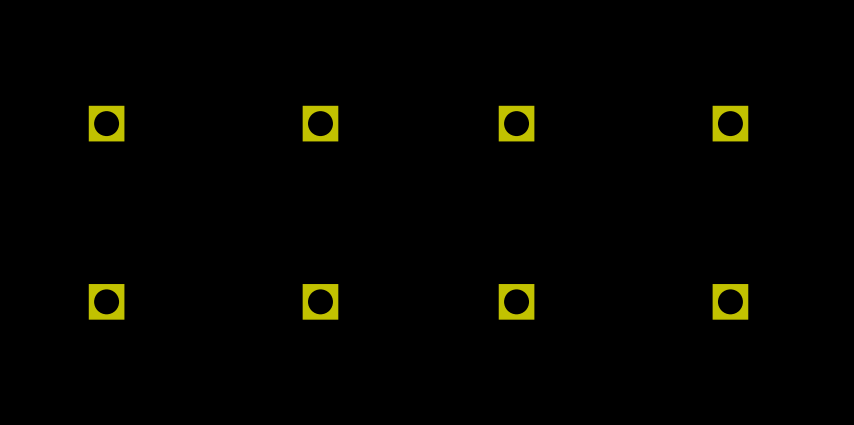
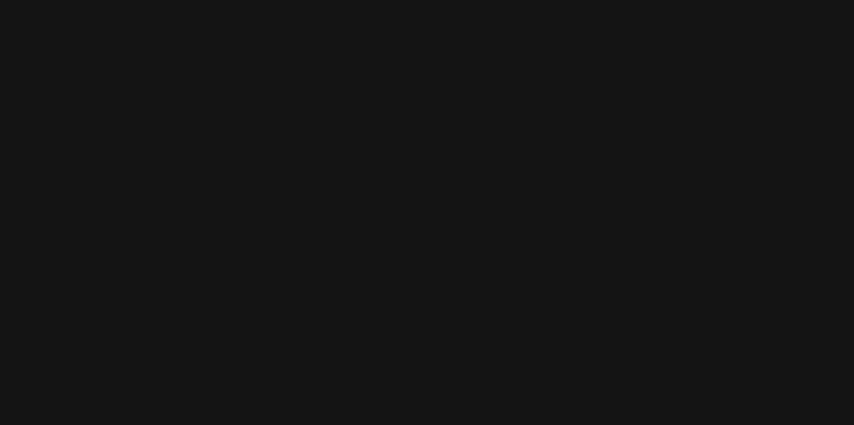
part: (106, 123) -> none
part: (320, 123) -> none
part: (516, 123) -> none
part: (730, 123) -> none
part: (106, 301) -> none
part: (320, 301) -> none
part: (516, 301) -> none
part: (730, 301) -> none

